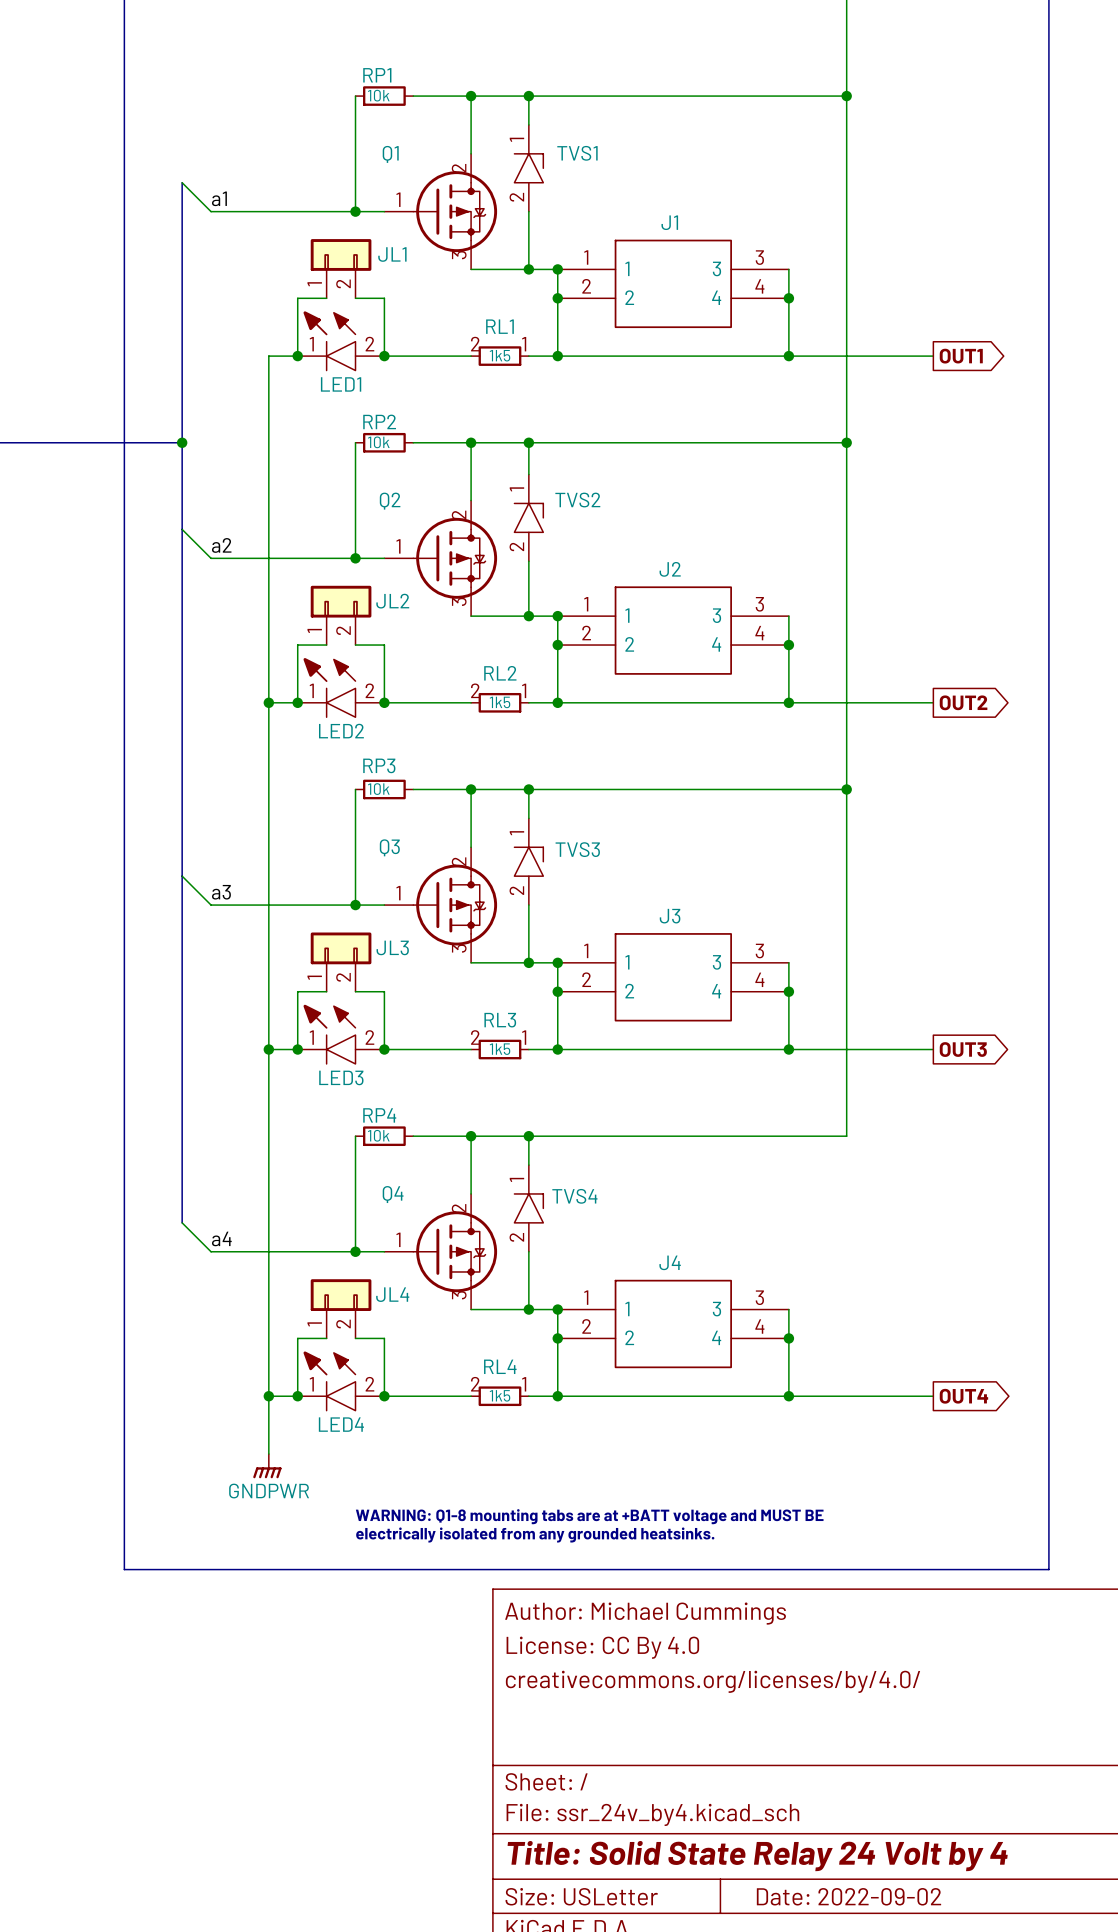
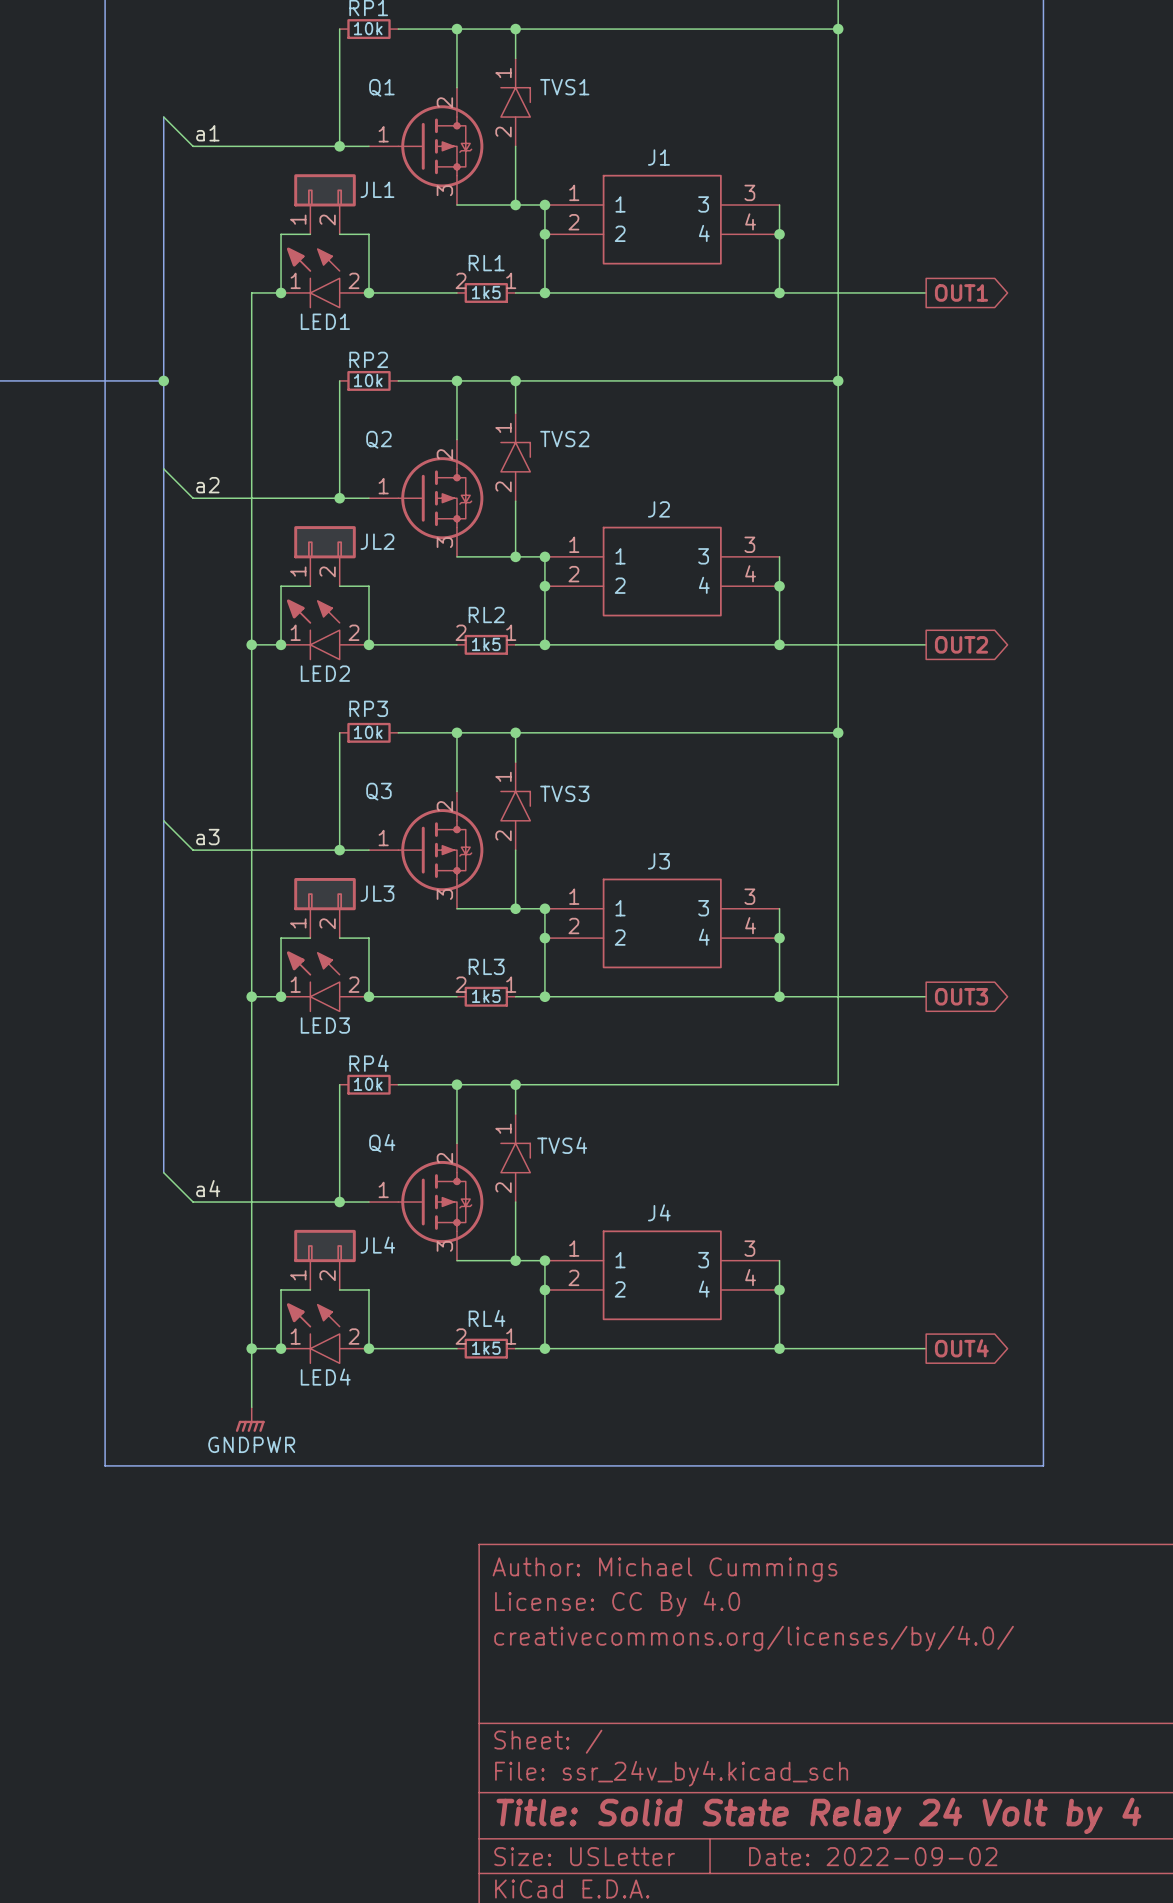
line: (124, 1511) (124, 1569) (1048, 1569) (1048, 1511) -> (105, 1465) (1043, 1465)
text: WARNING: Q1-8 mounting tabs are at +BATT voltage and MUST BE (589, 1516) -> none
text: electrically isolated from any grounded heatsinks. (535, 1535) -> none

